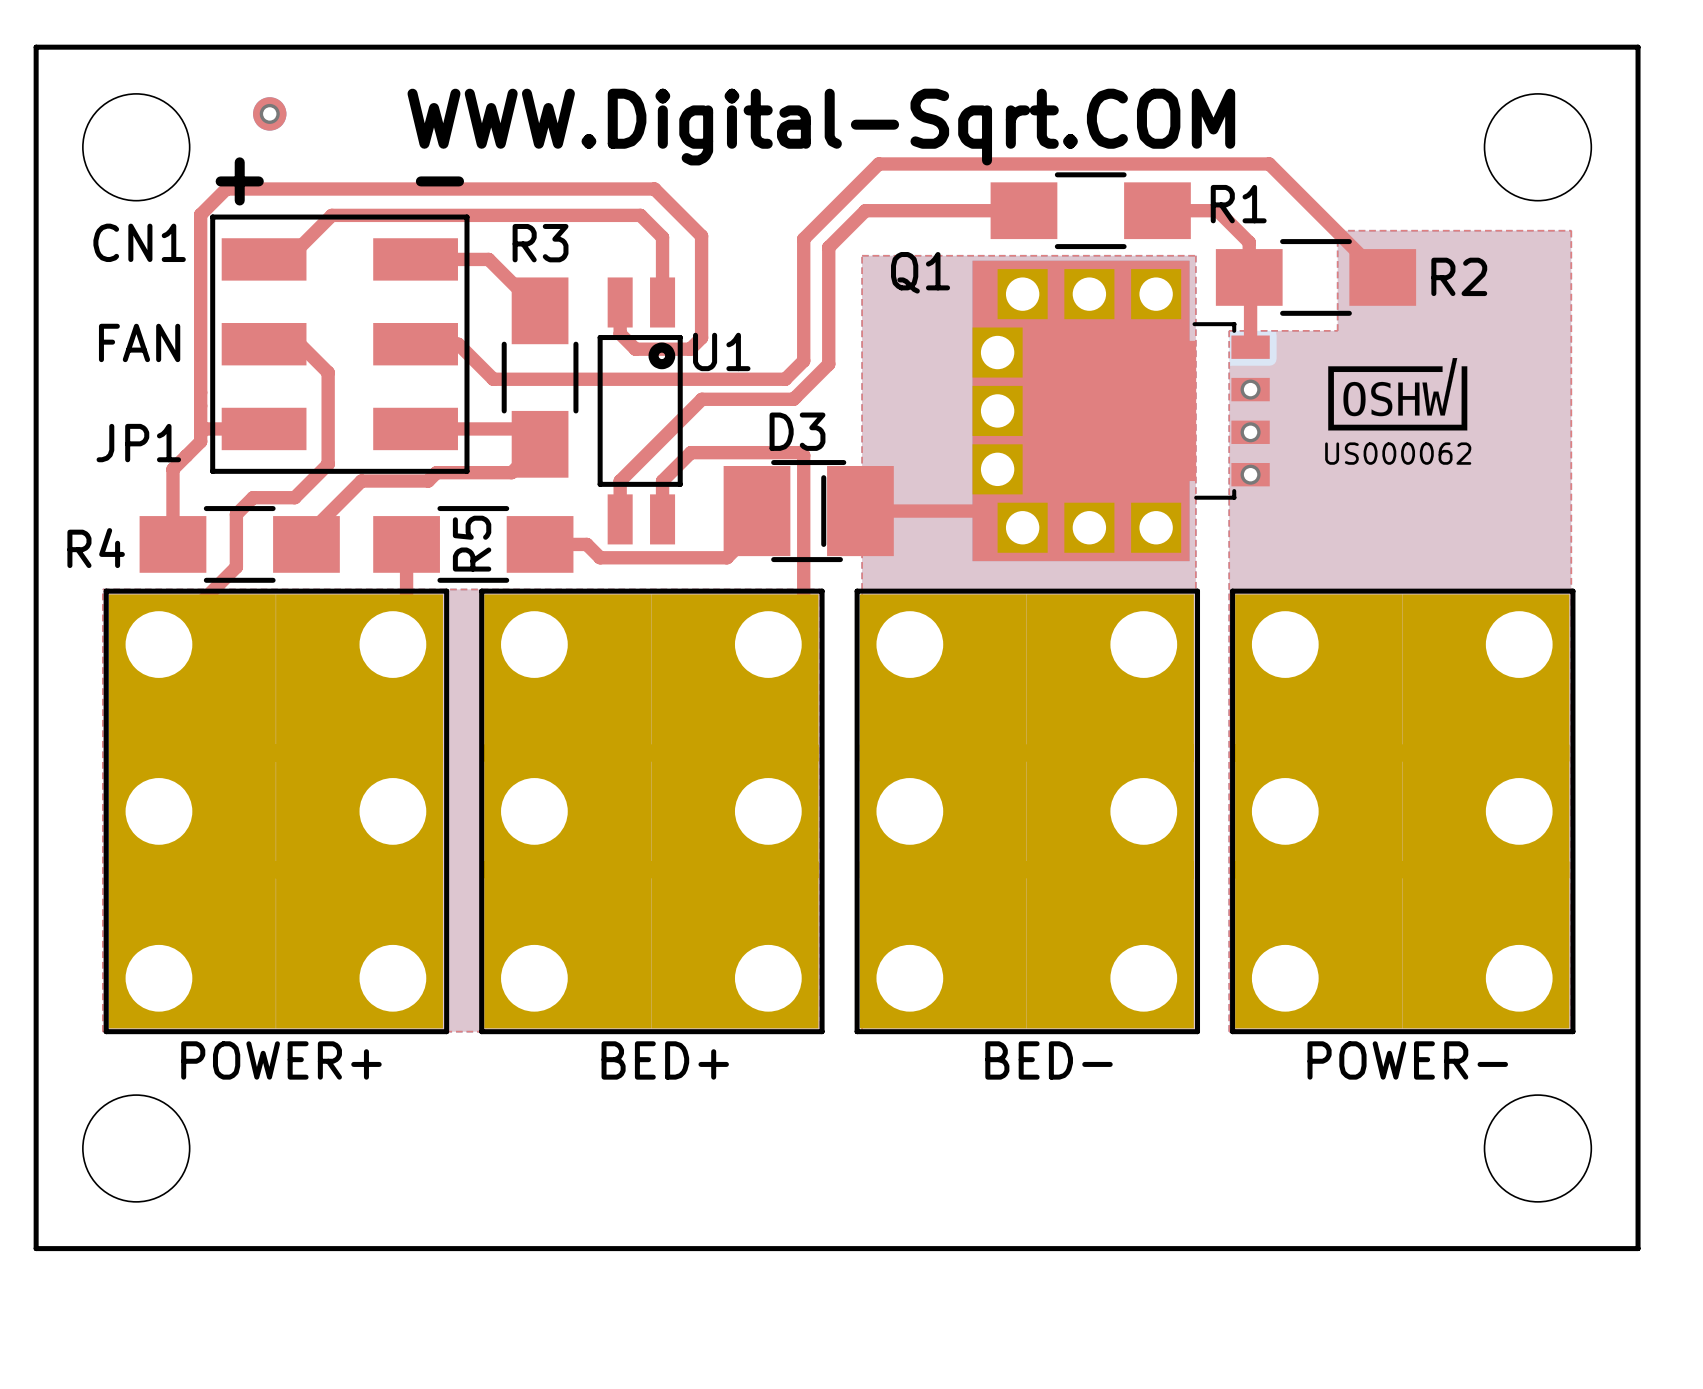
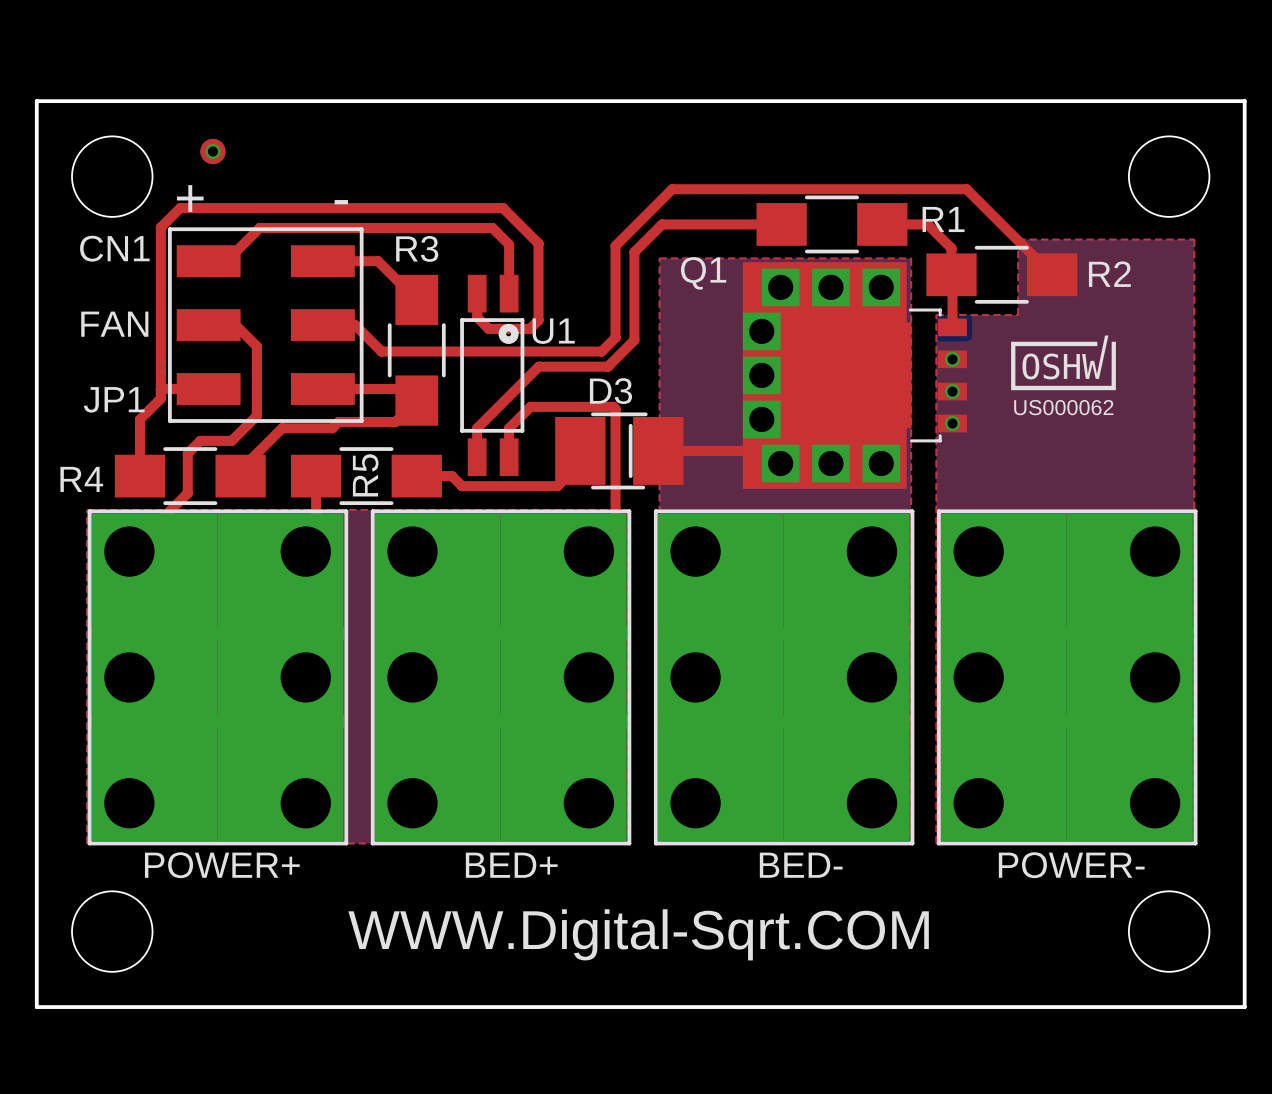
text: WWW.Digital-Sqrt.COM (821, 127) -> none
text: none -> WWW.Digital-Sqrt.COM (638, 934)

